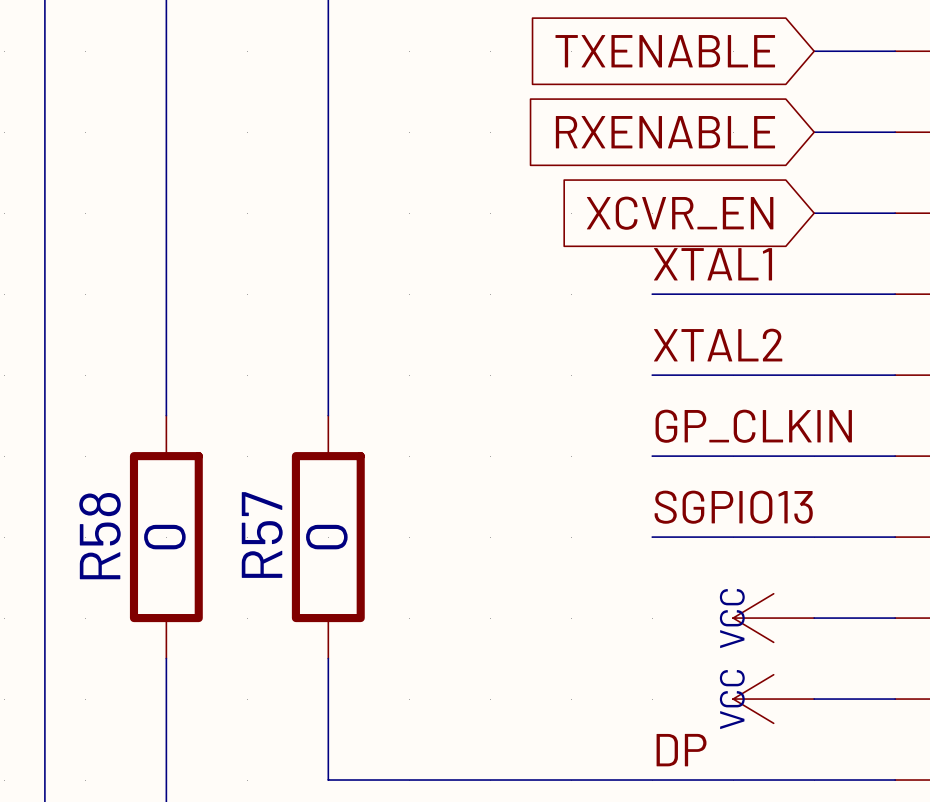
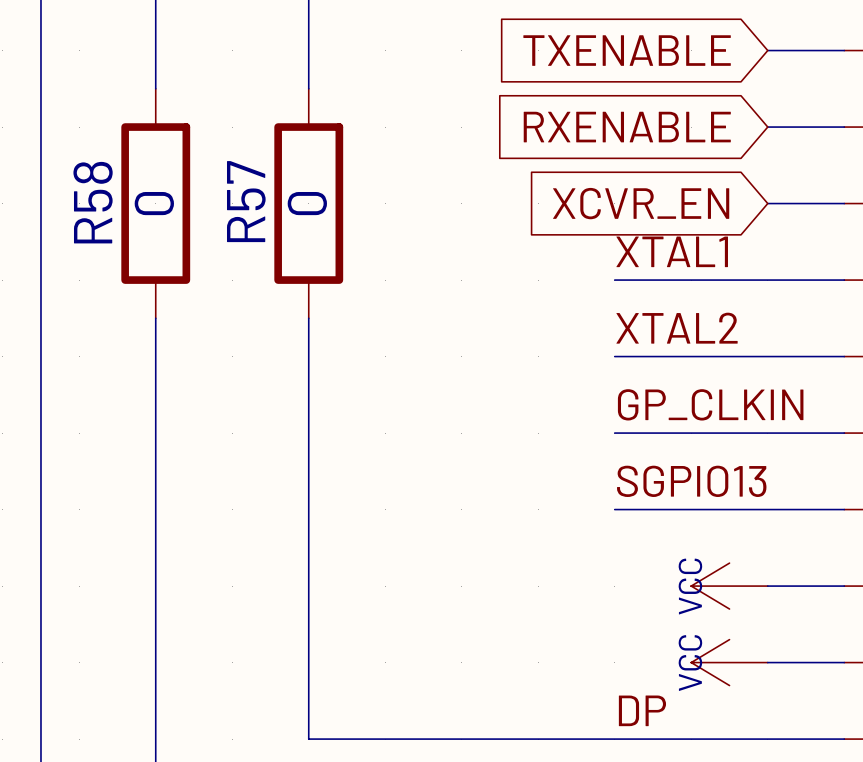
wire: (166, 91) (166, 334) -> (155, 394) (155, 624)
wire: (328, 91) (328, 334) -> (308, 394) (308, 624)
R58 position: (166, 537) -> (155, 203)
R57 position: (328, 537) -> (308, 203)

